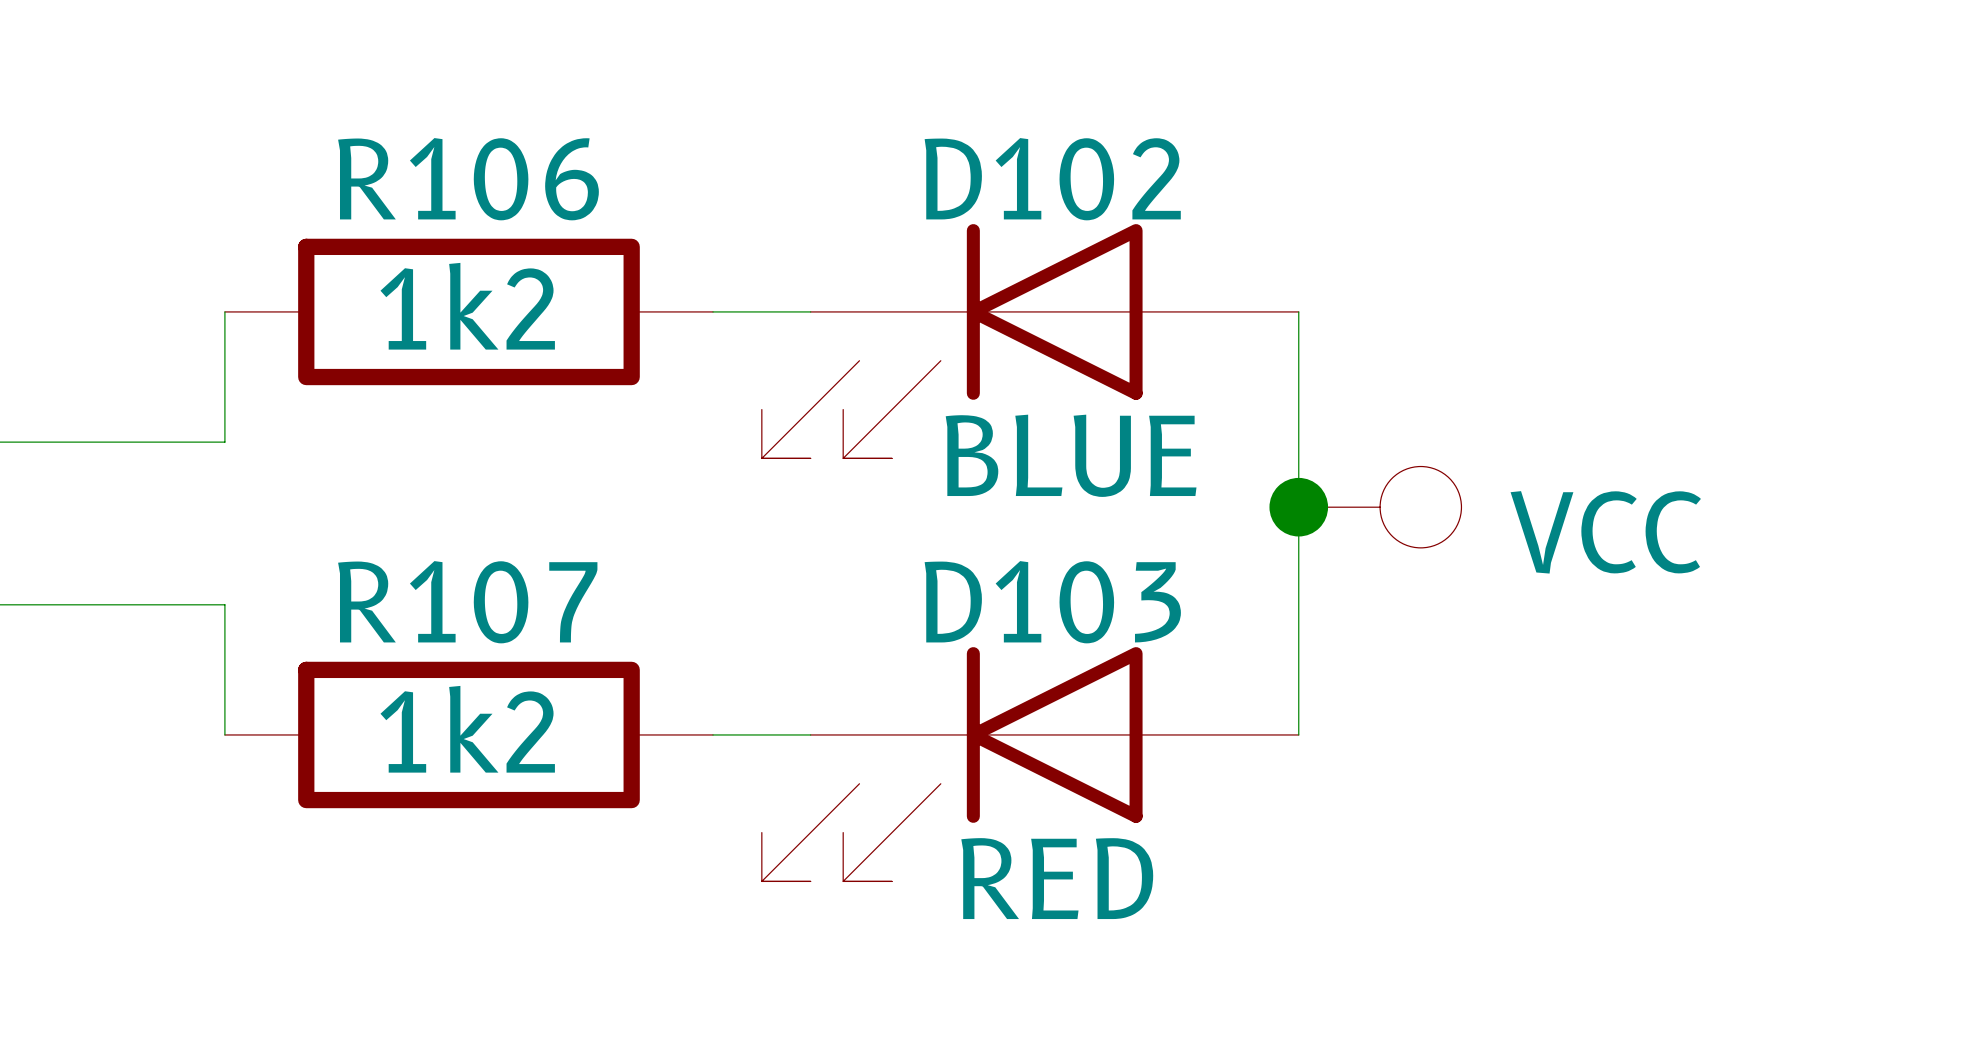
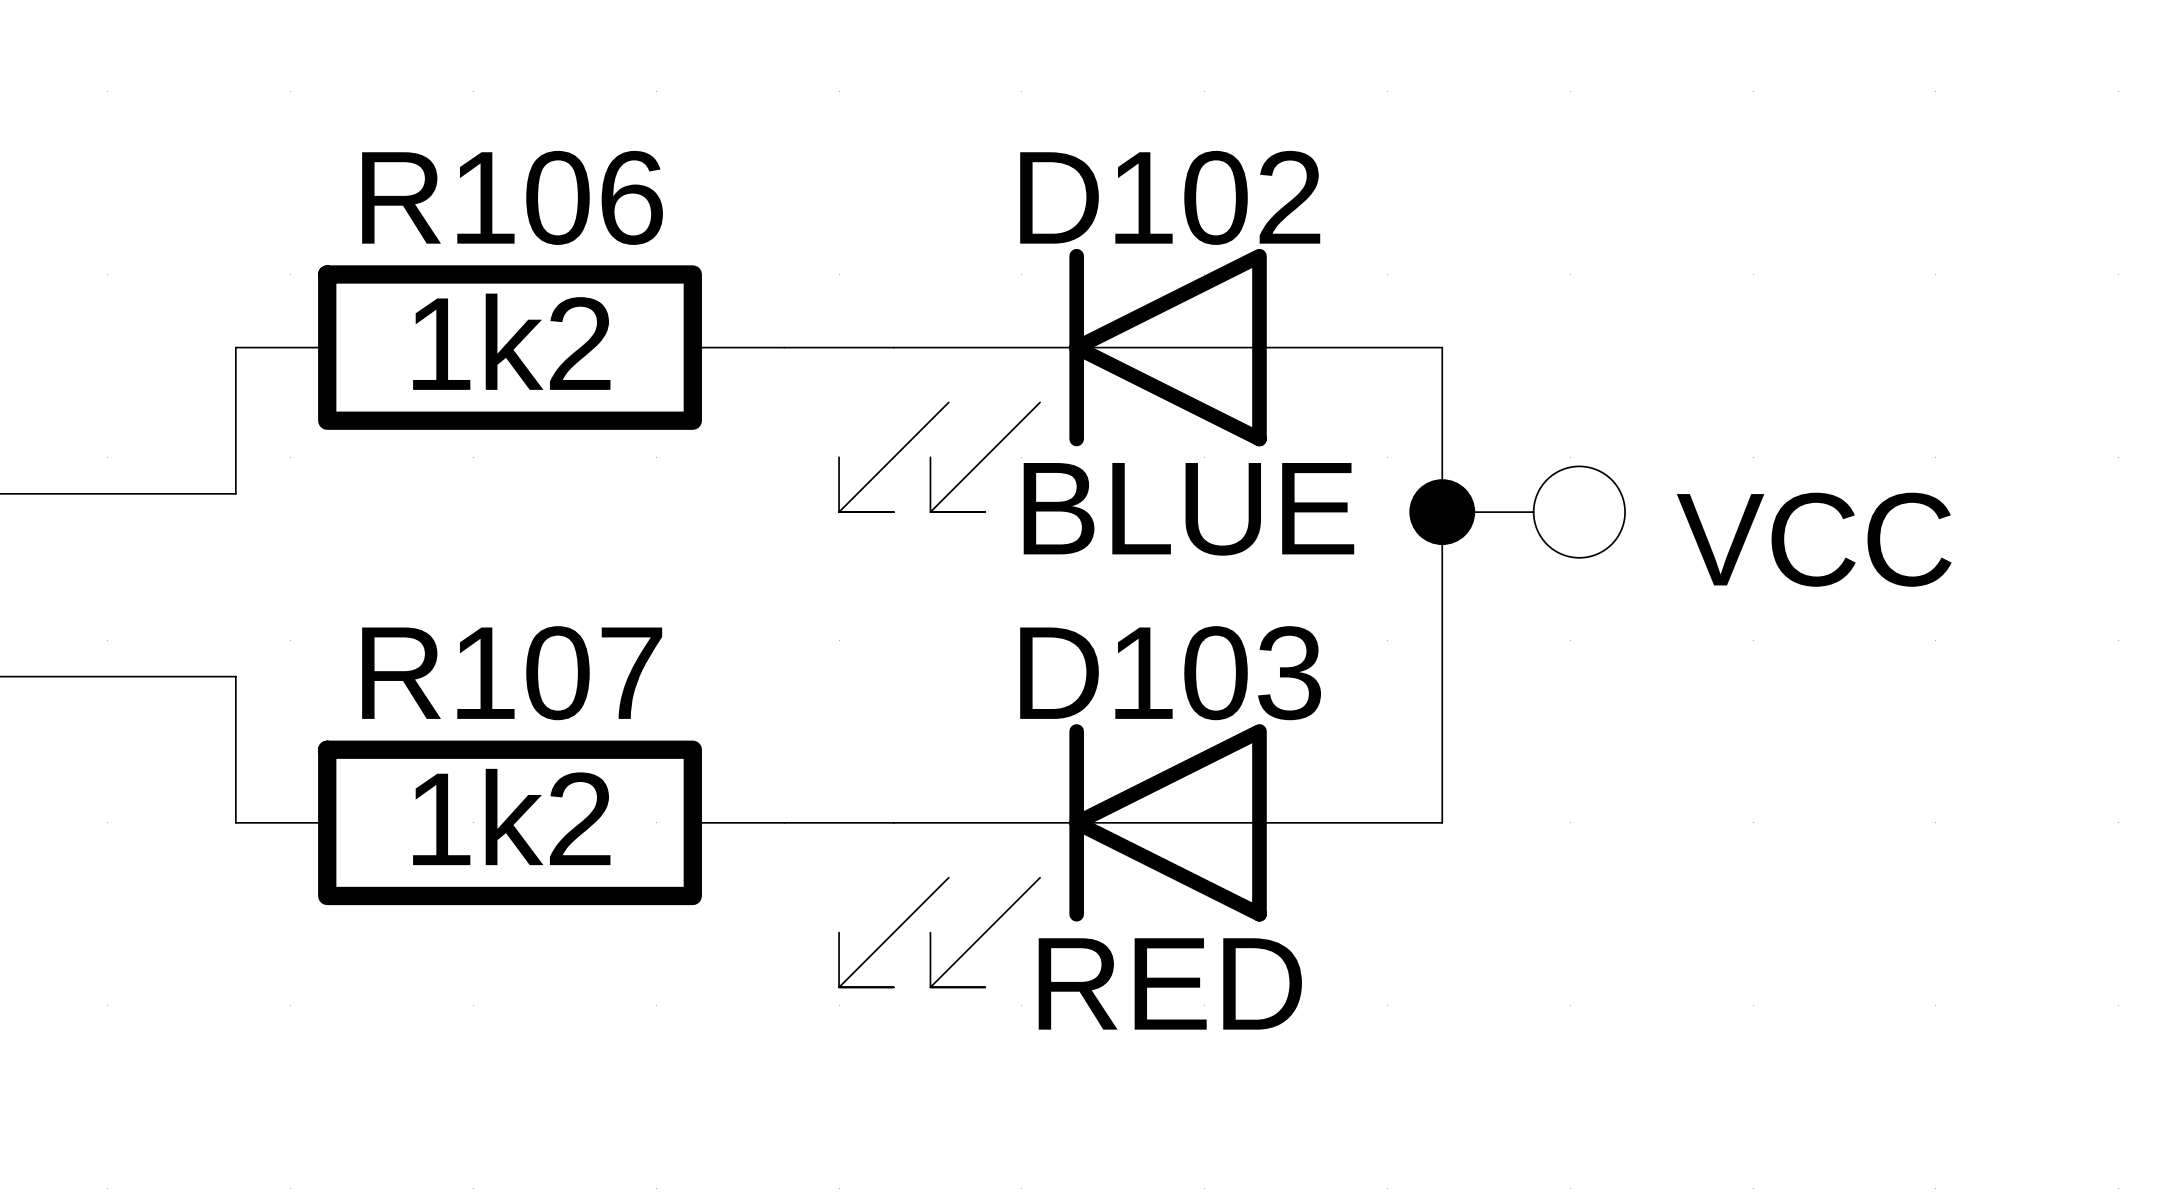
junction position: (1298, 507) -> (1442, 512)
power symbol position: VCC (1380, 507) -> VCC (1533, 512)

